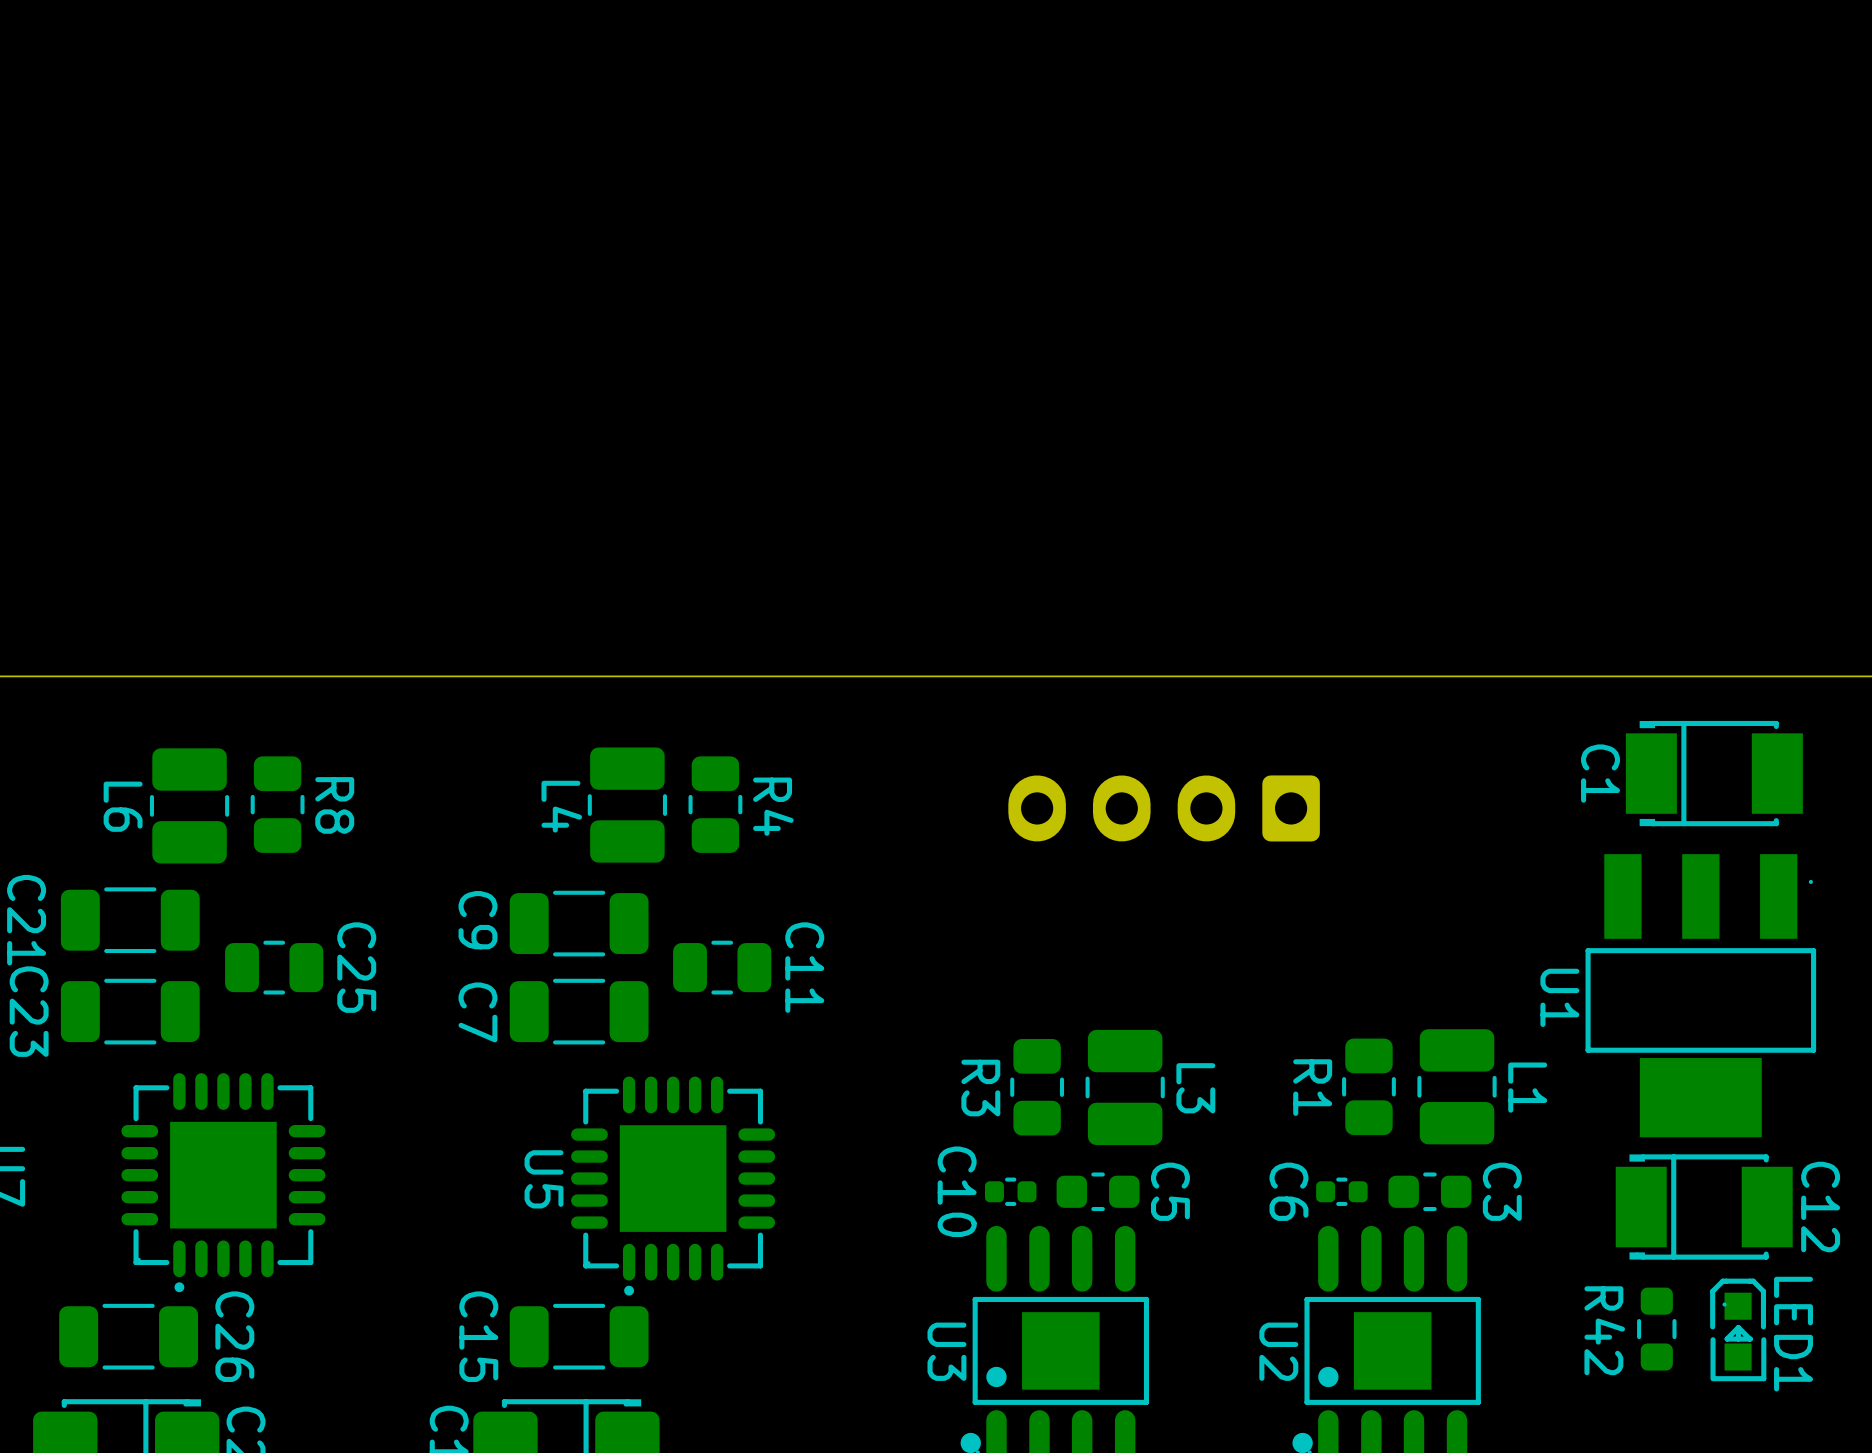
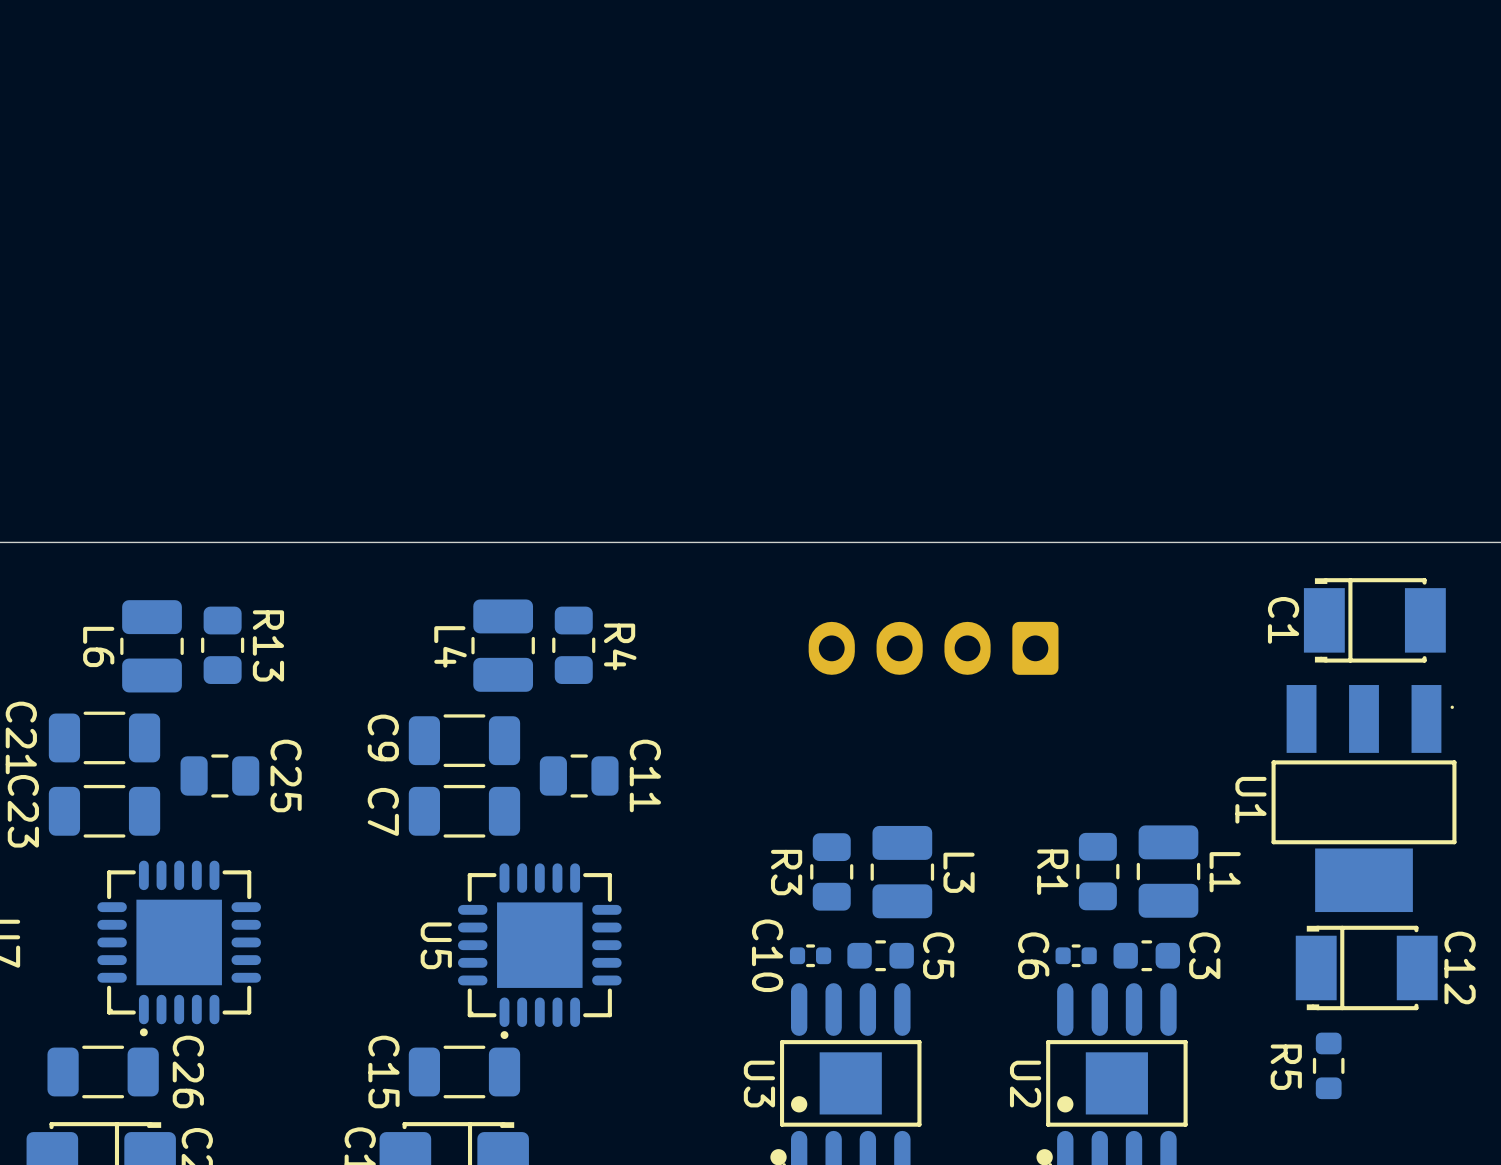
R8 name: R8 (334, 805) -> R13 (268, 645)
LED1: (1738, 1329) -> none
R42 name: R42 (1604, 1330) -> R5 (1286, 1067)

